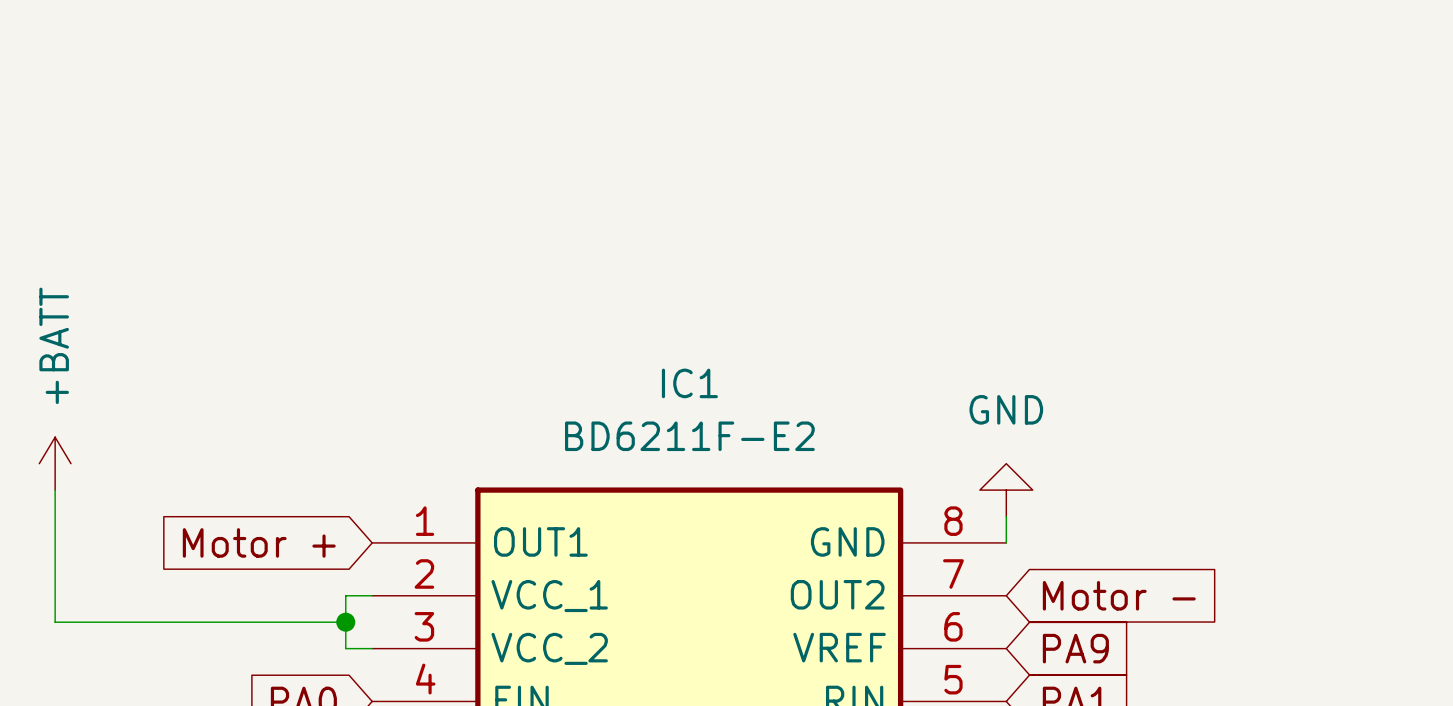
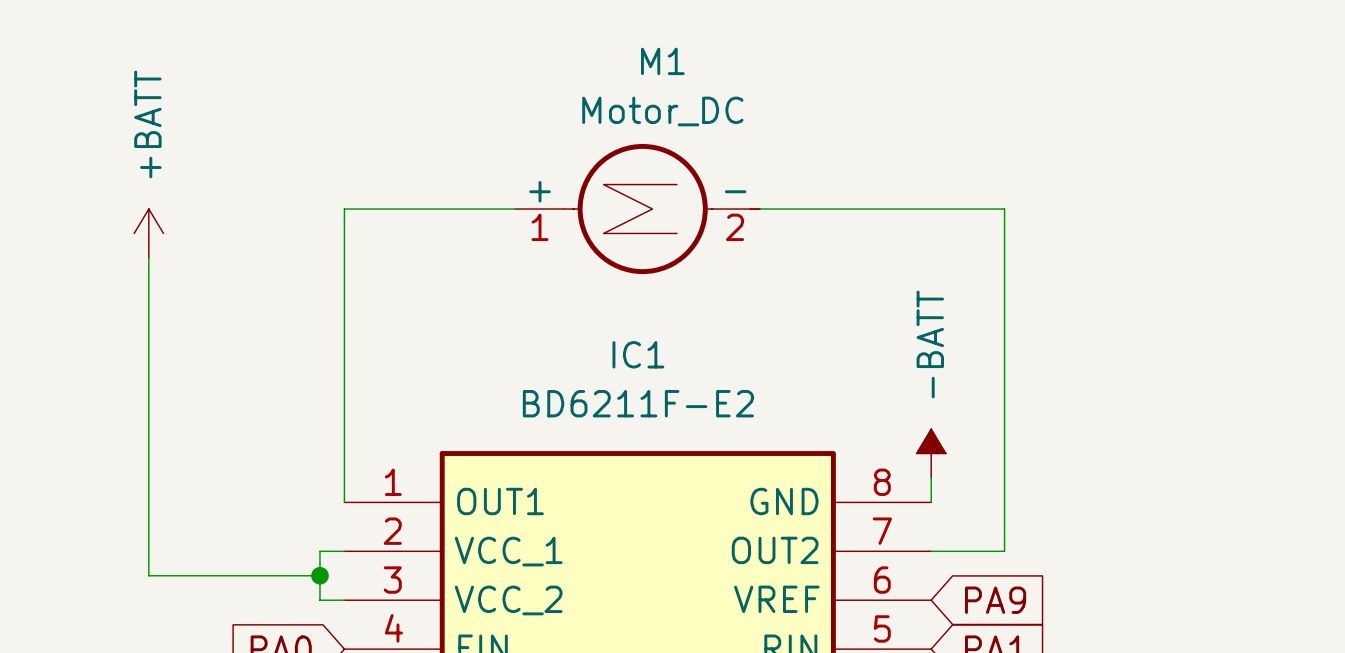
wire: none -> (515, 209) (344, 209) (344, 502)
M1: none -> Motor_DC (637, 209)
wire: none -> (760, 209) (1004, 209) (1004, 551) (931, 551)
power symbol position: +BATT (55, 463) -> +BATT (148, 233)
wire: (55, 490) (55, 622) (160, 622) -> (148, 257) (148, 575)
power symbol: GND (1006, 490) -> -BATT (931, 453)
global label: Motor + (259, 542) -> none
global label: Motor - (1119, 595) -> none

